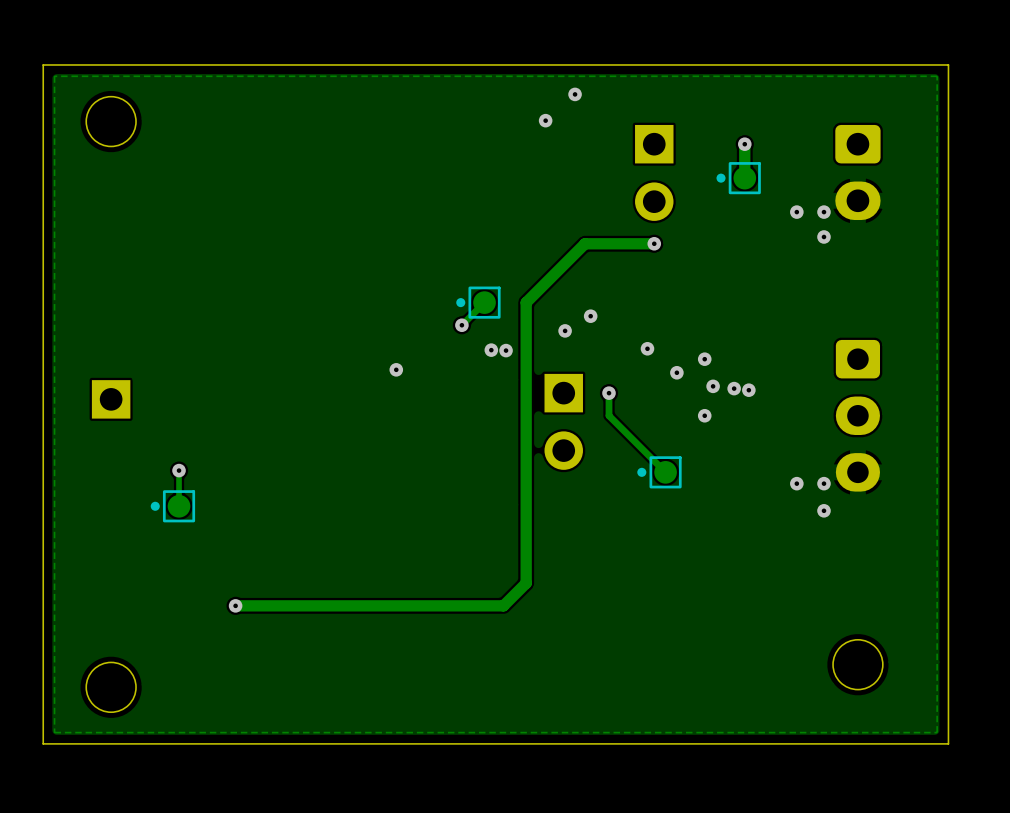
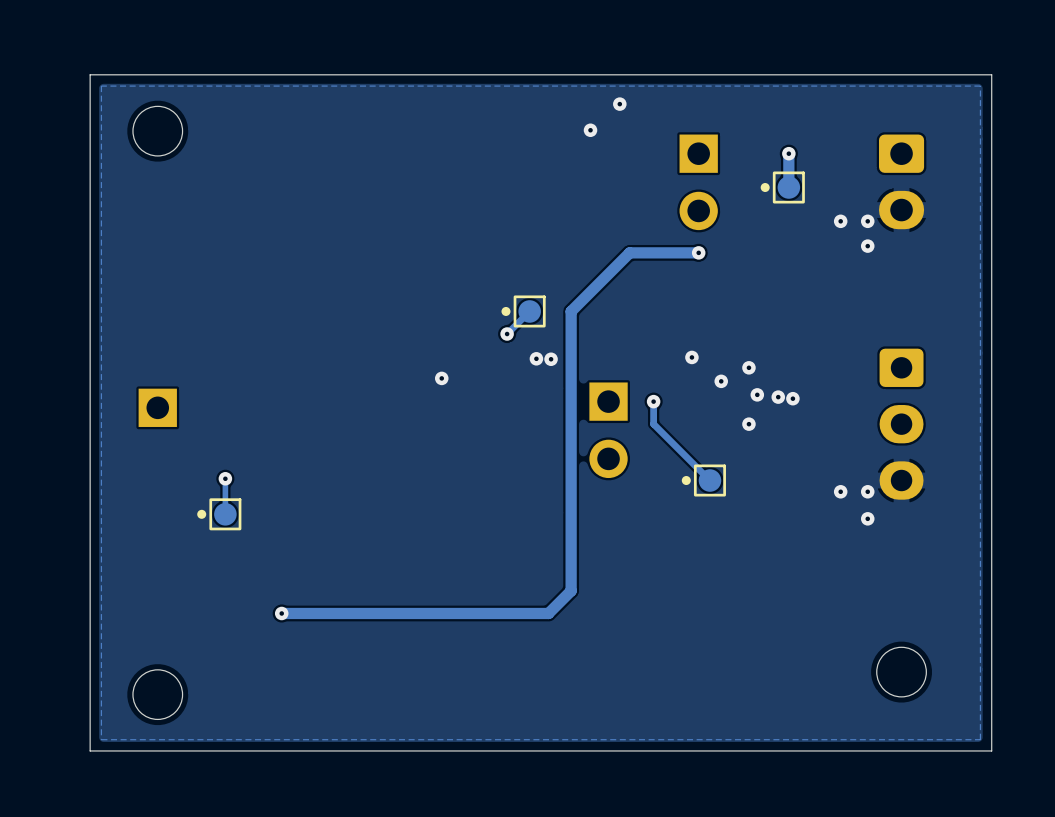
via: (590, 316) -> none
via: (565, 330) -> none

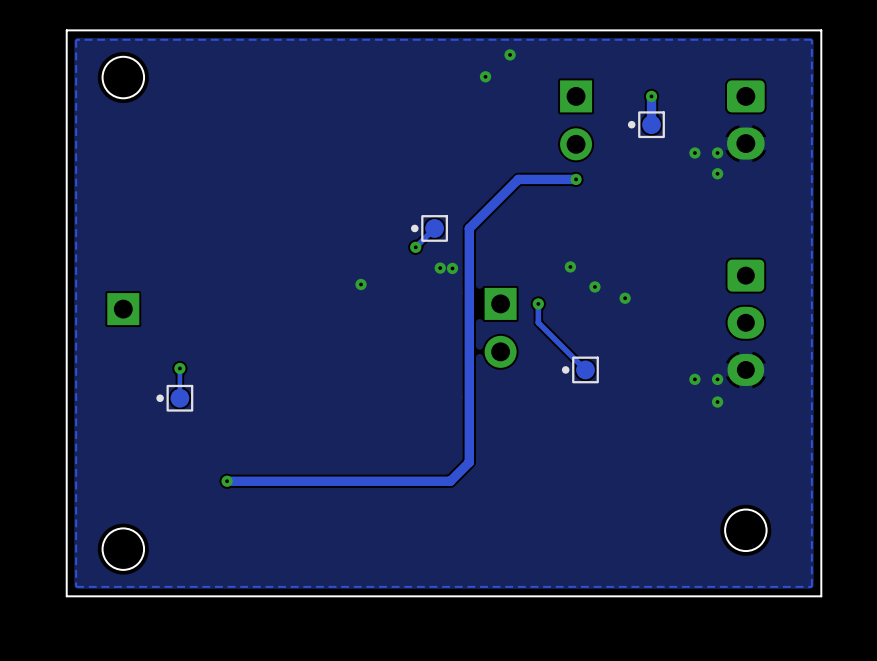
via: (748, 367) -> none
via: (778, 397) -> none
via: (792, 398) -> none
via: (748, 424) -> none

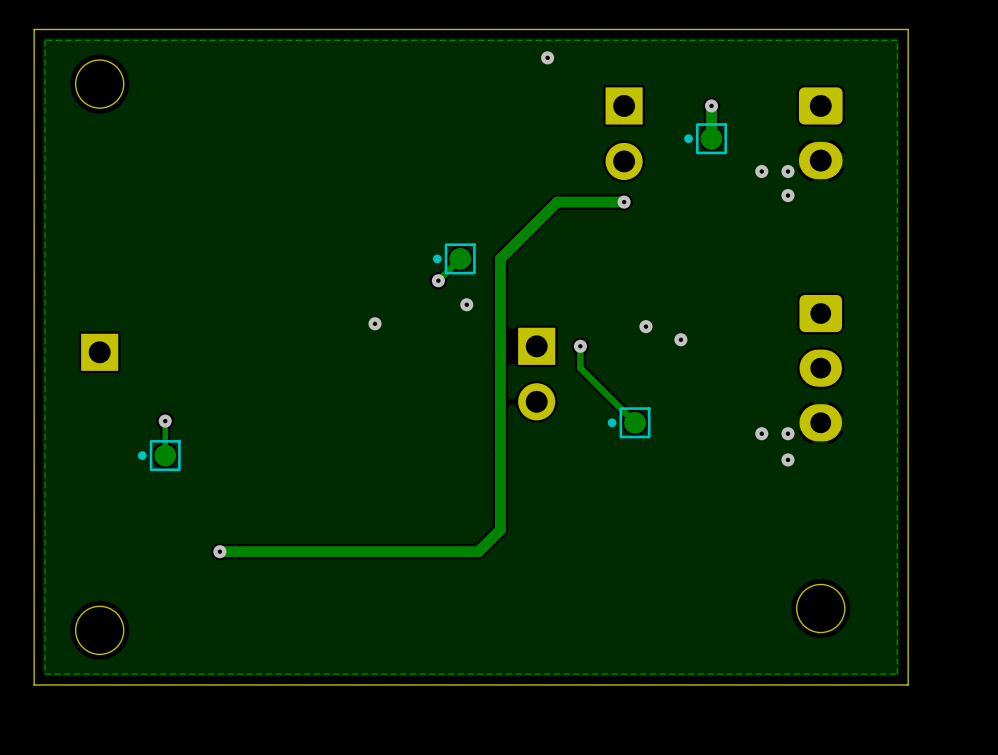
via: (485, 76) -> none
via: (570, 266) -> none
via: (452, 268) -> none

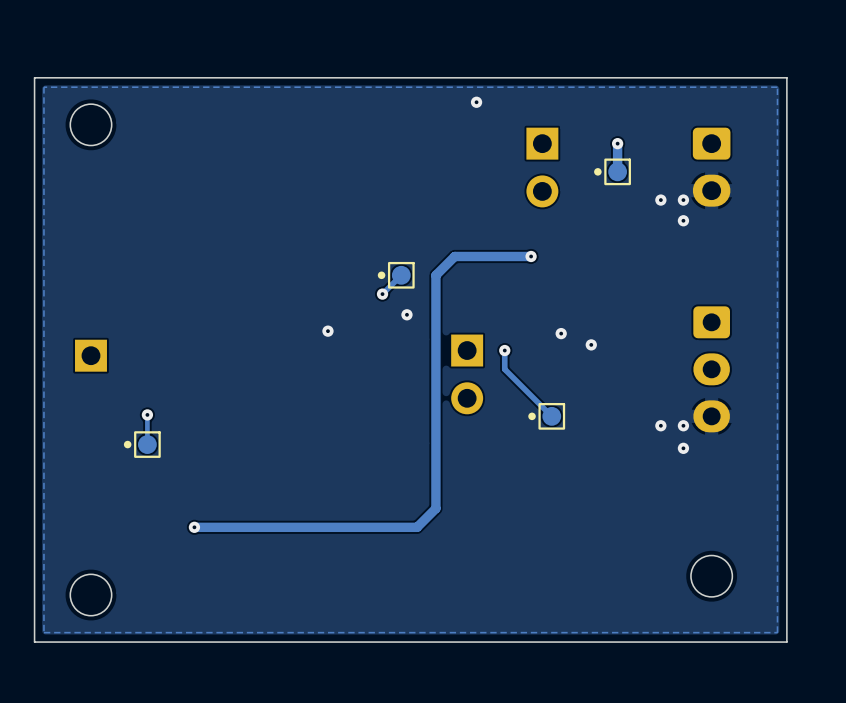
track: (624, 202) (557, 202) (522, 237) -> (531, 256) (454, 256)
via position: (624, 202) -> (531, 256)

